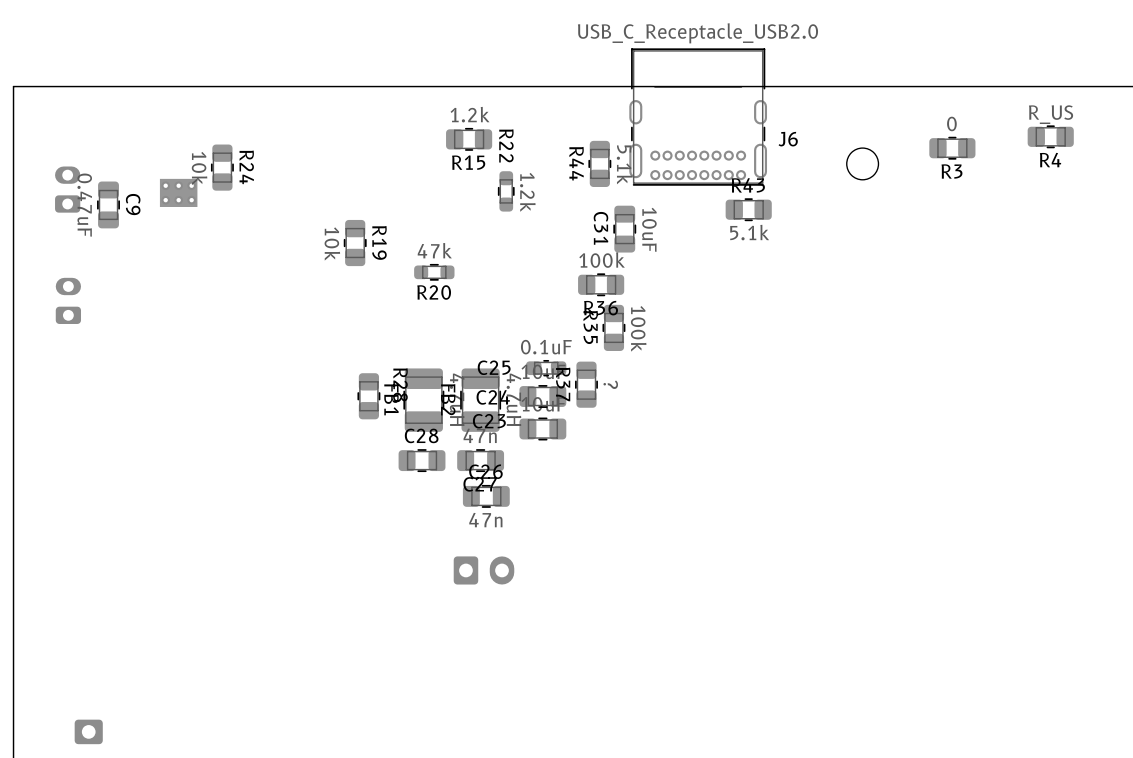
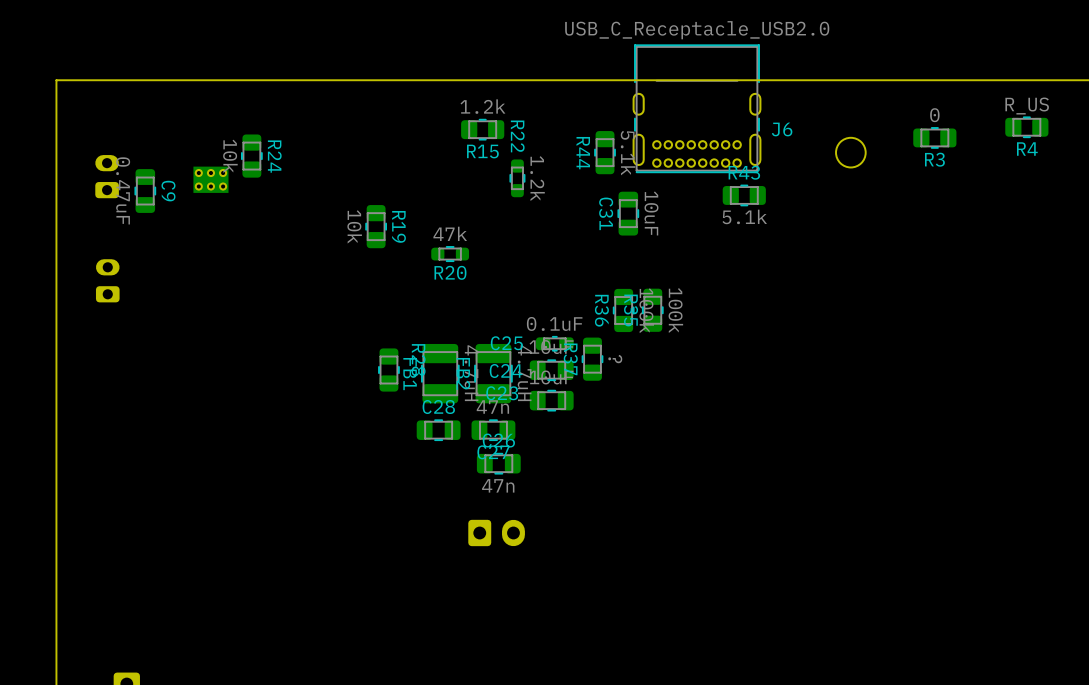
R36 rotation: 0° (601, 284) -> 90° clockwise (623, 310)
R36 position: (601, 284) -> (623, 310)
R35 position: (613, 327) -> (652, 310)

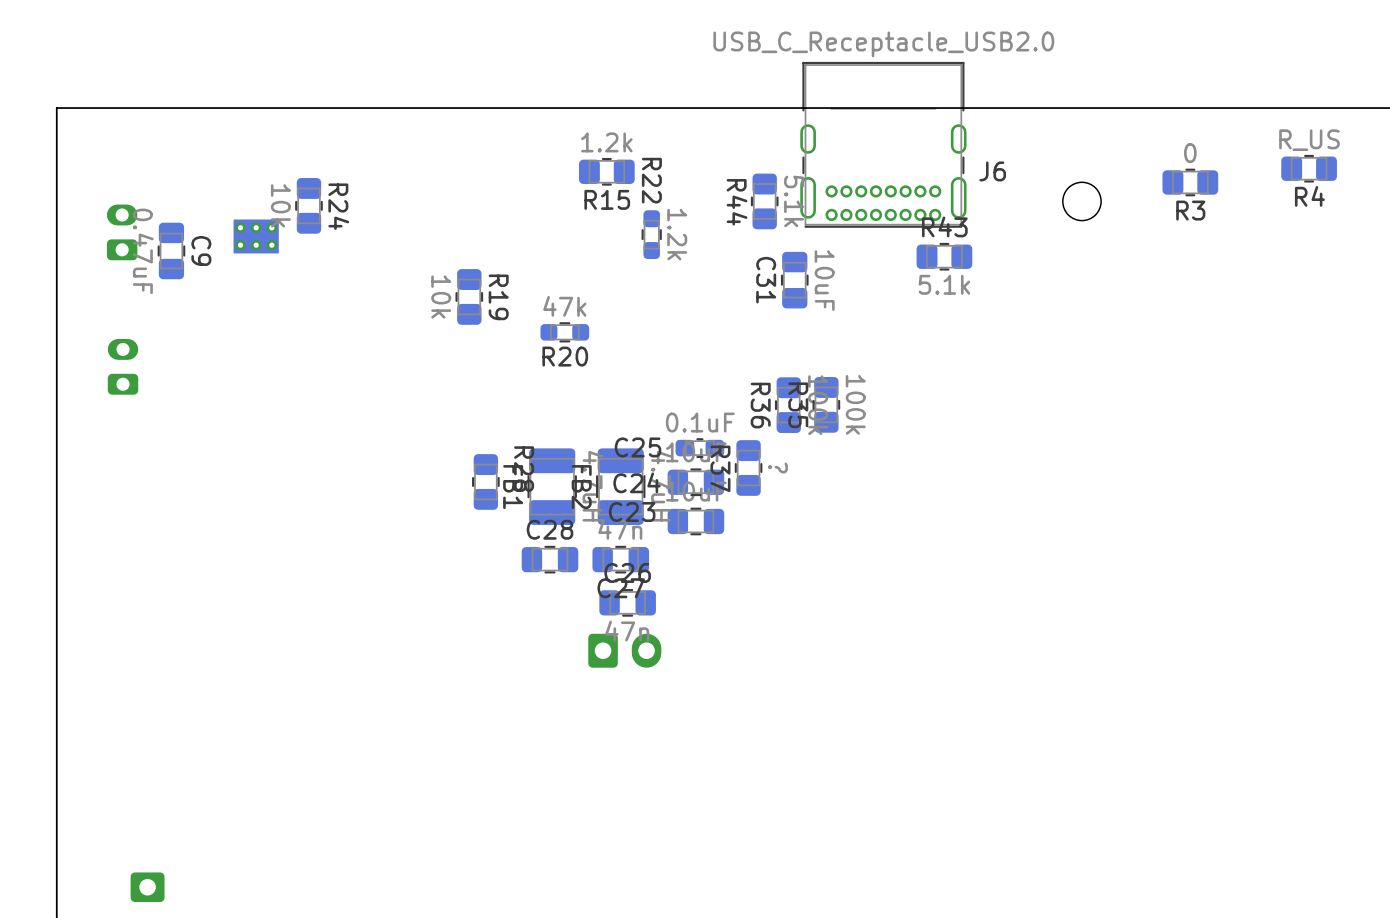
part position: (496, 532) -> (624, 650)

